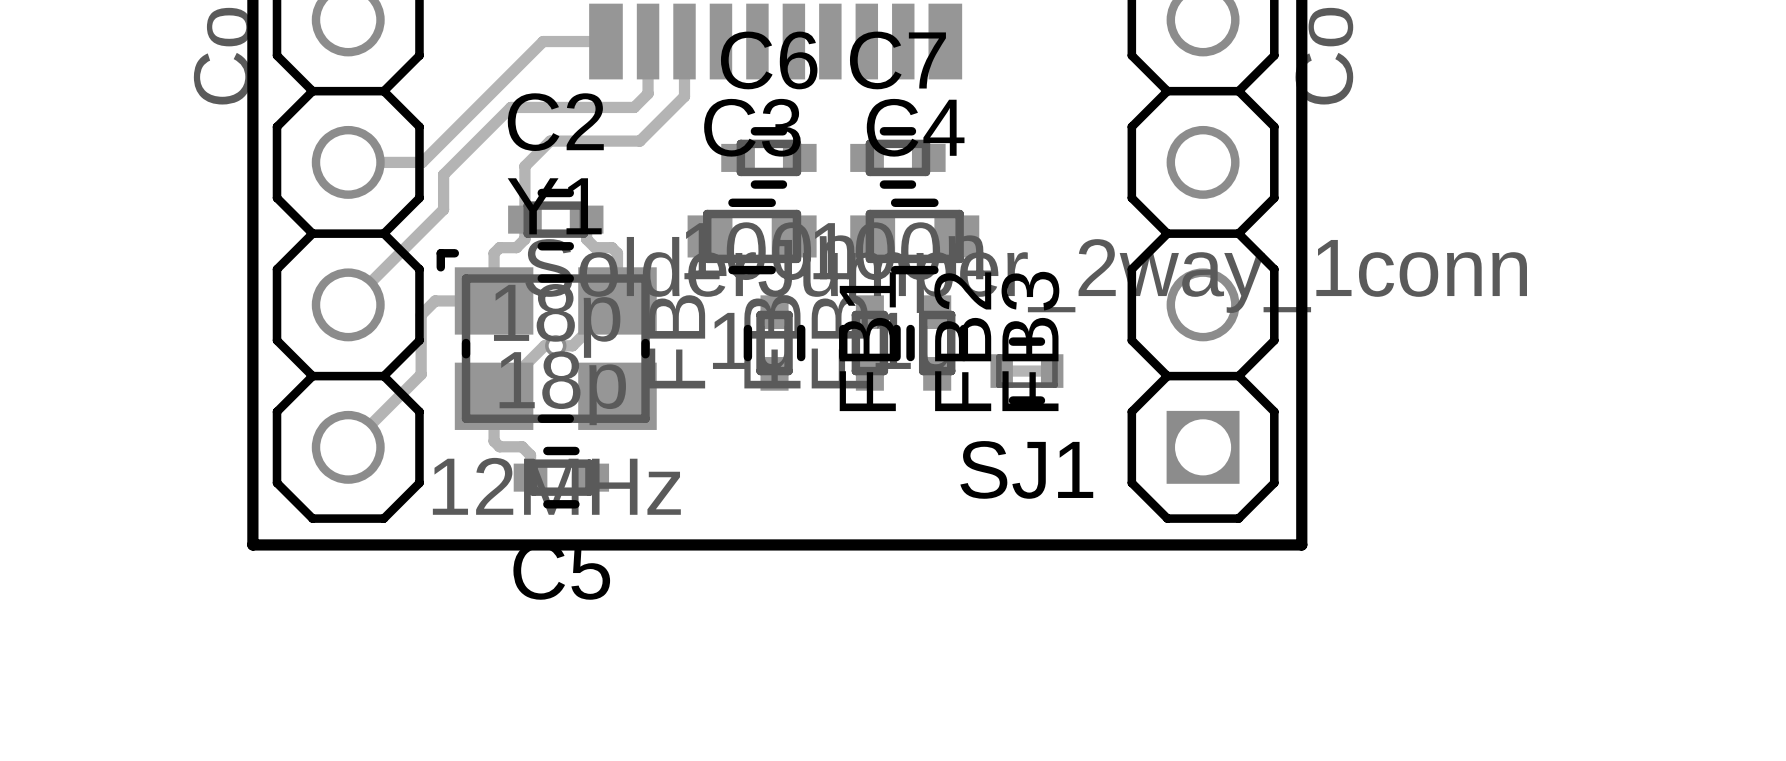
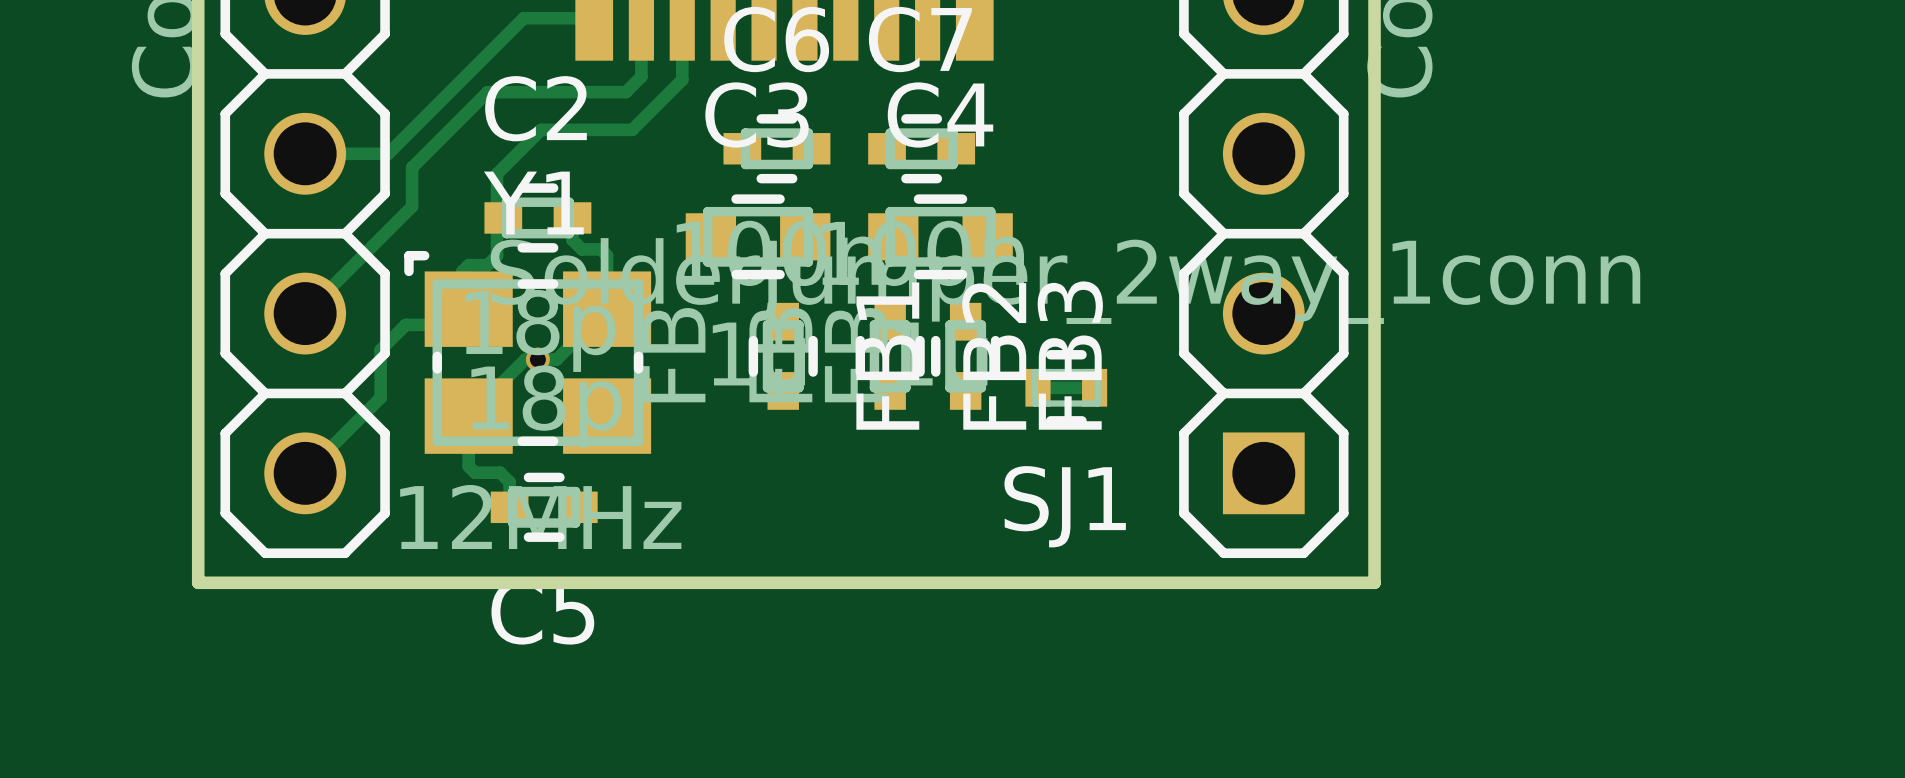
track: (558, 141) (550, 141) (524, 166) (524, 239) (516, 247) (499, 247) (494, 253) (494, 300) (435, 300) (421, 314) (421, 374) (415, 380) -> (541, 129) (497, 173) (497, 255) (487, 265) (468, 265) (462, 271) (462, 324) (405, 324) (380, 350) (380, 397)

